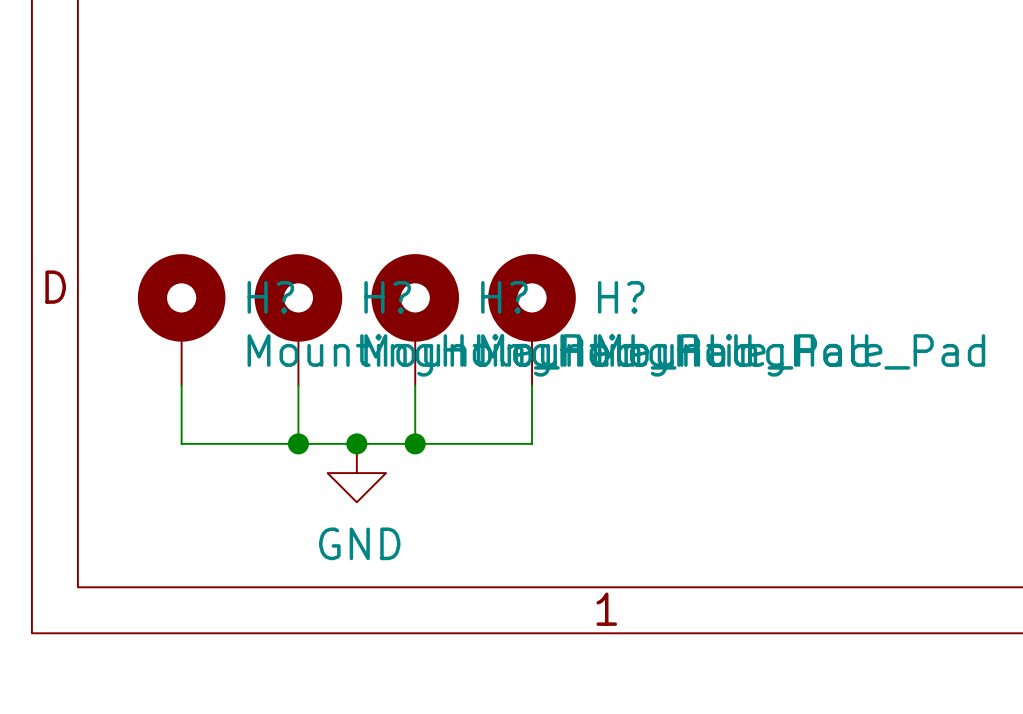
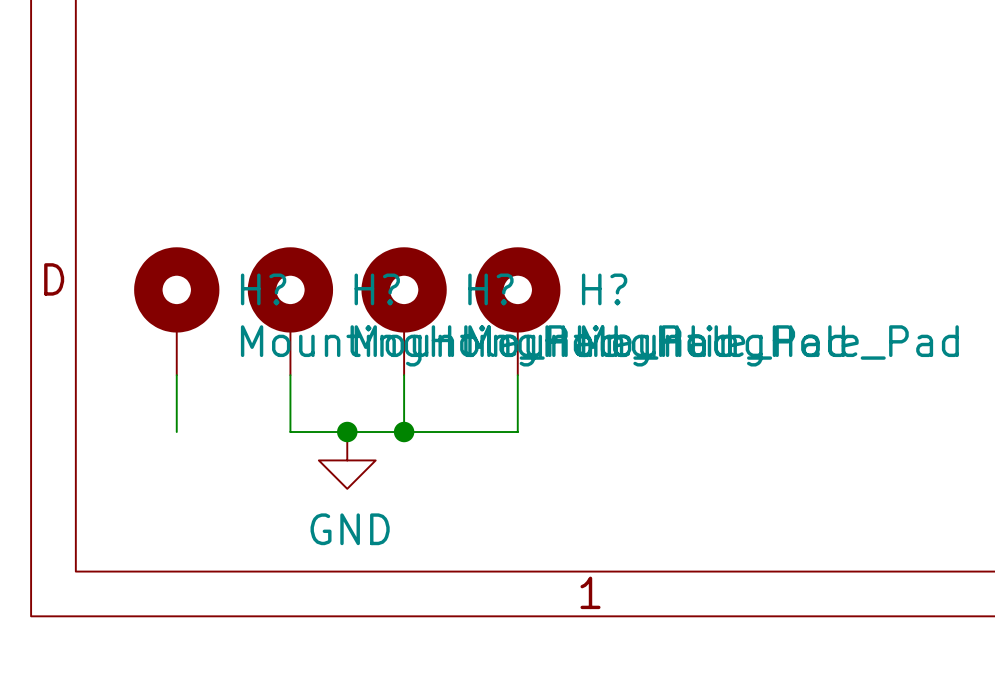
wire: (181, 443) (298, 443) -> none
junction: (298, 443) -> none

